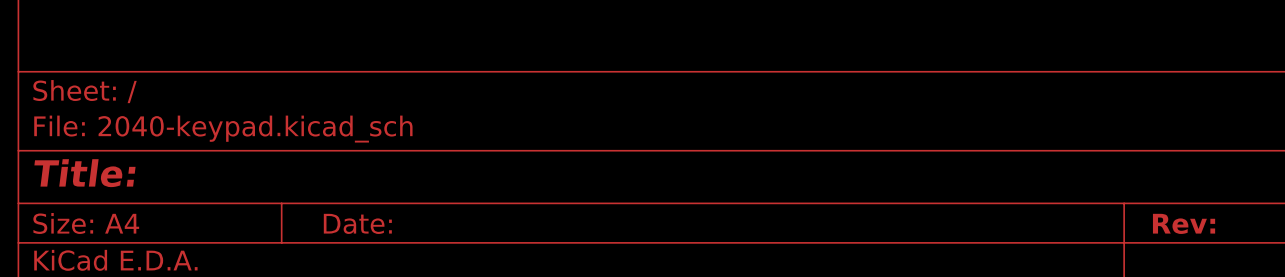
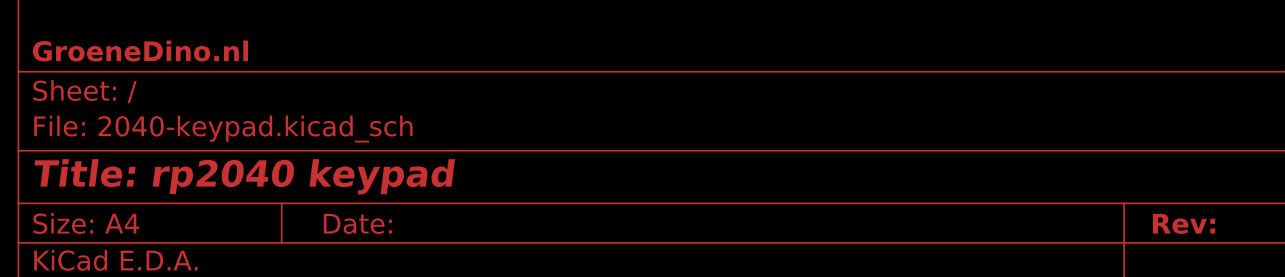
title block: none -> GroeneDino.nl (140, 51)
title block: Title: (84, 173) -> Title: rp2040 keypad (244, 176)

